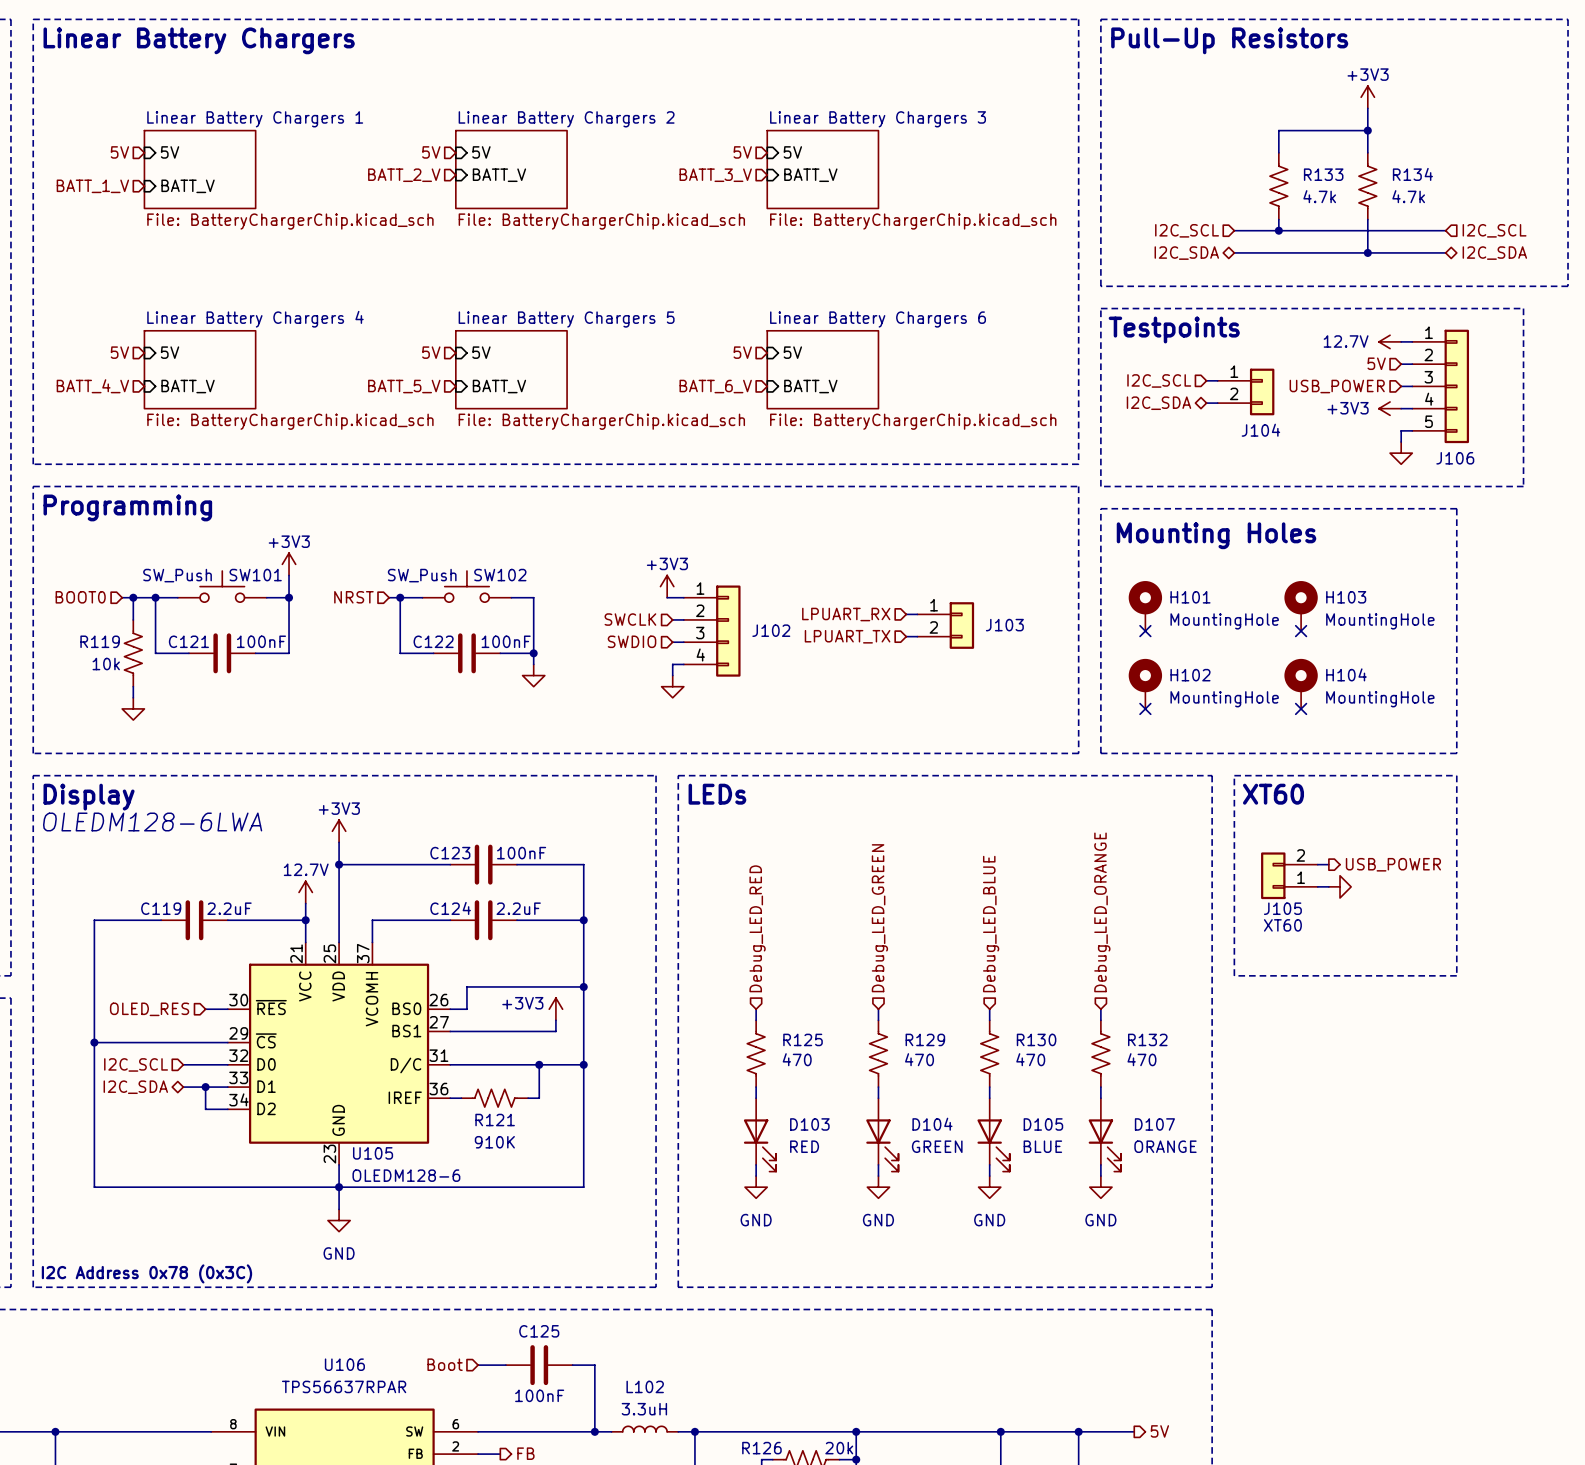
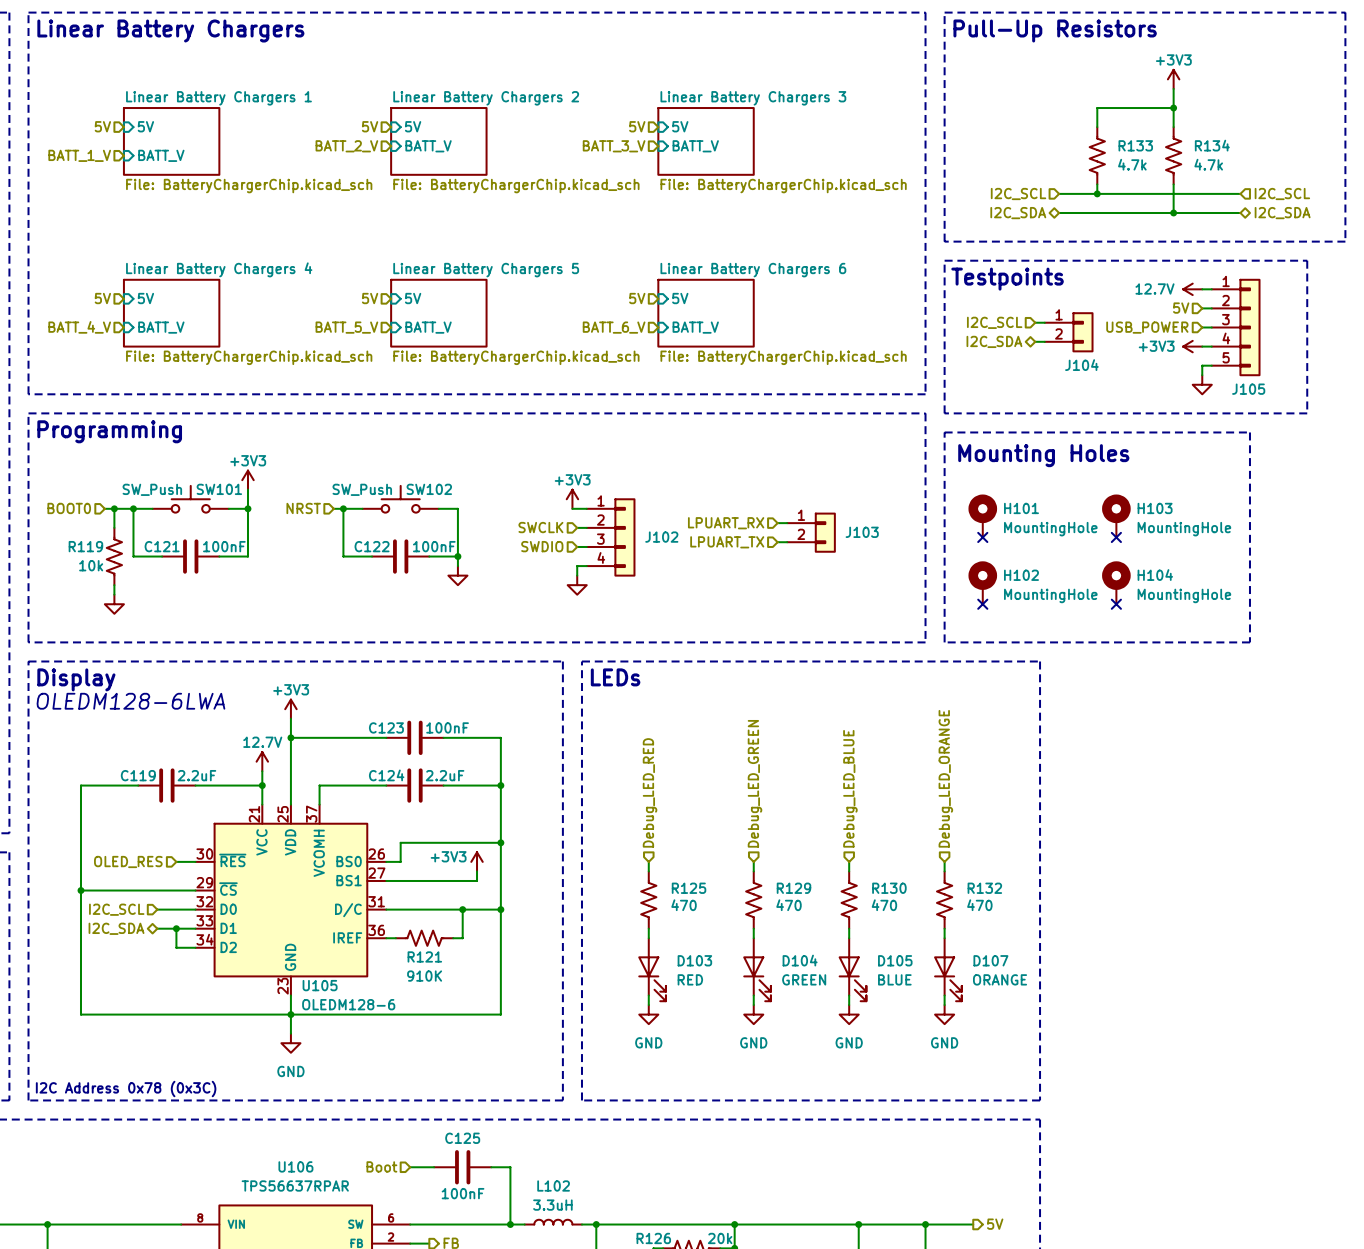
J106 name: J106 (1455, 458) -> J105 (1248, 389)
line: (1234, 775) (1456, 775) (1456, 975) (1234, 975) (1234, 775) -> none
text: XT60 (1273, 794) -> none
wire: (1317, 864) (1328, 864) -> none
hierarchical label: USB_POWER (1393, 864) -> none
J105: XT60 (1289, 875) -> none
wire: (1317, 886) (1328, 886) -> none
power symbol: (1340, 886) -> none

